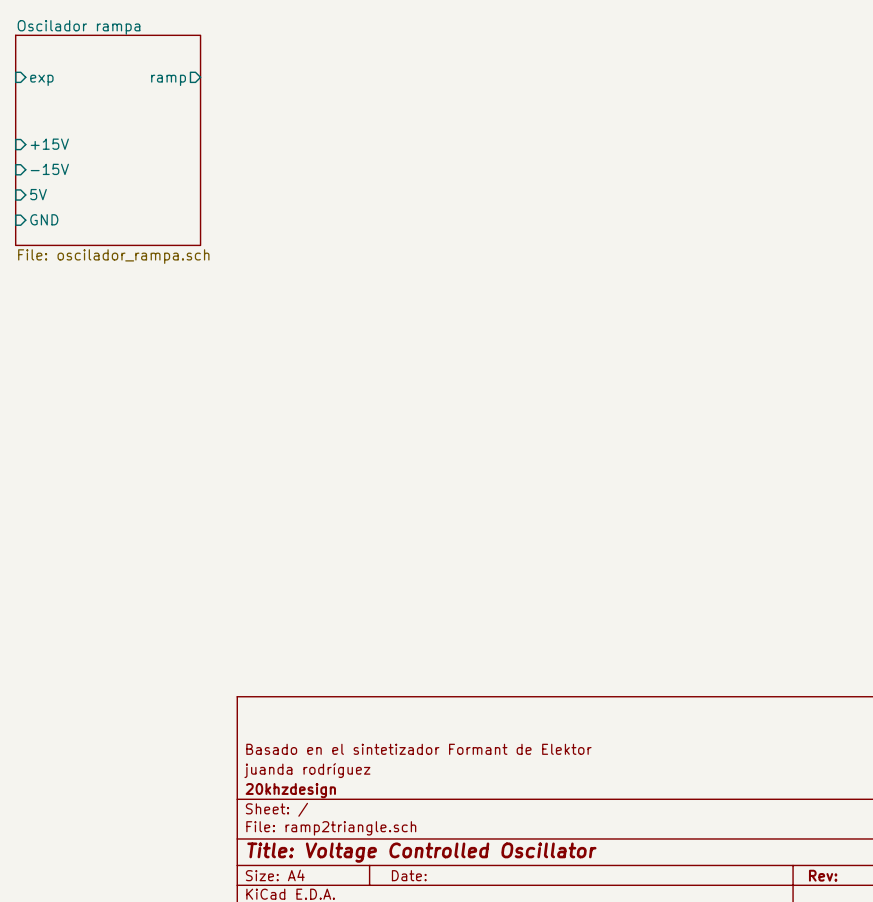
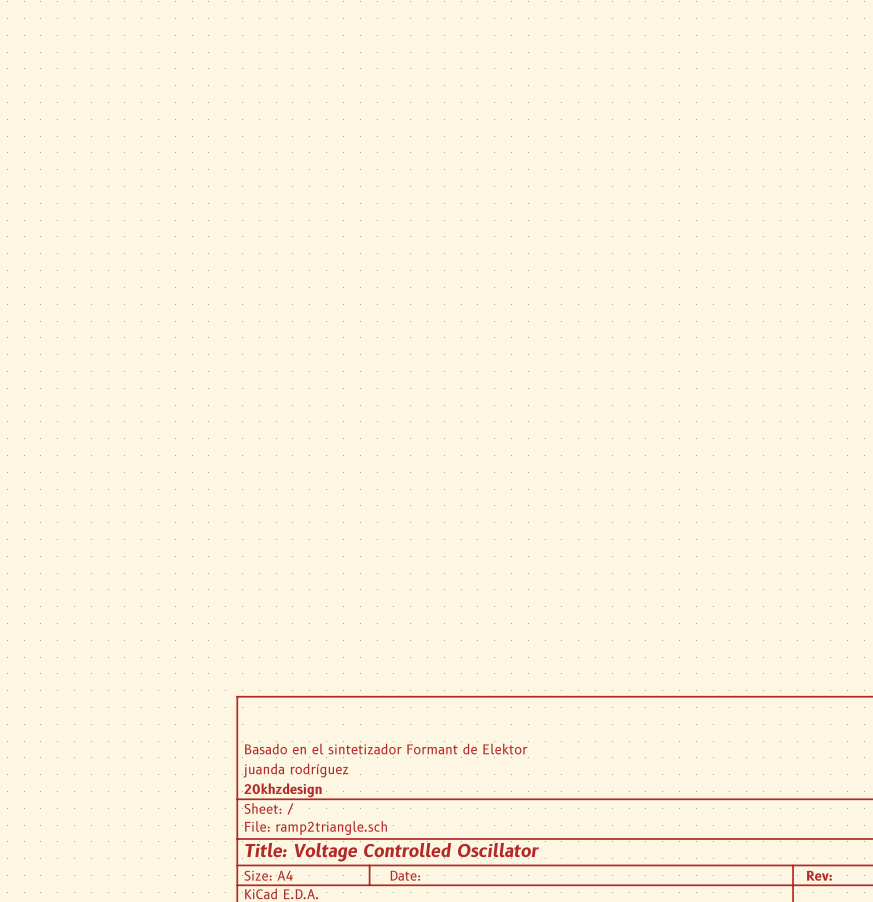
sheet pin: exp (41, 80) -> none
sheet pin: ramp (168, 80) -> none
sheet Oscilador rampa: File: oscilador_rampa.sch (108, 140) -> none
sheet pin: +15V (49, 144) -> none
sheet pin: -15V (49, 169) -> none
sheet pin: 5V (38, 194) -> none
sheet pin: GND (44, 219) -> none

